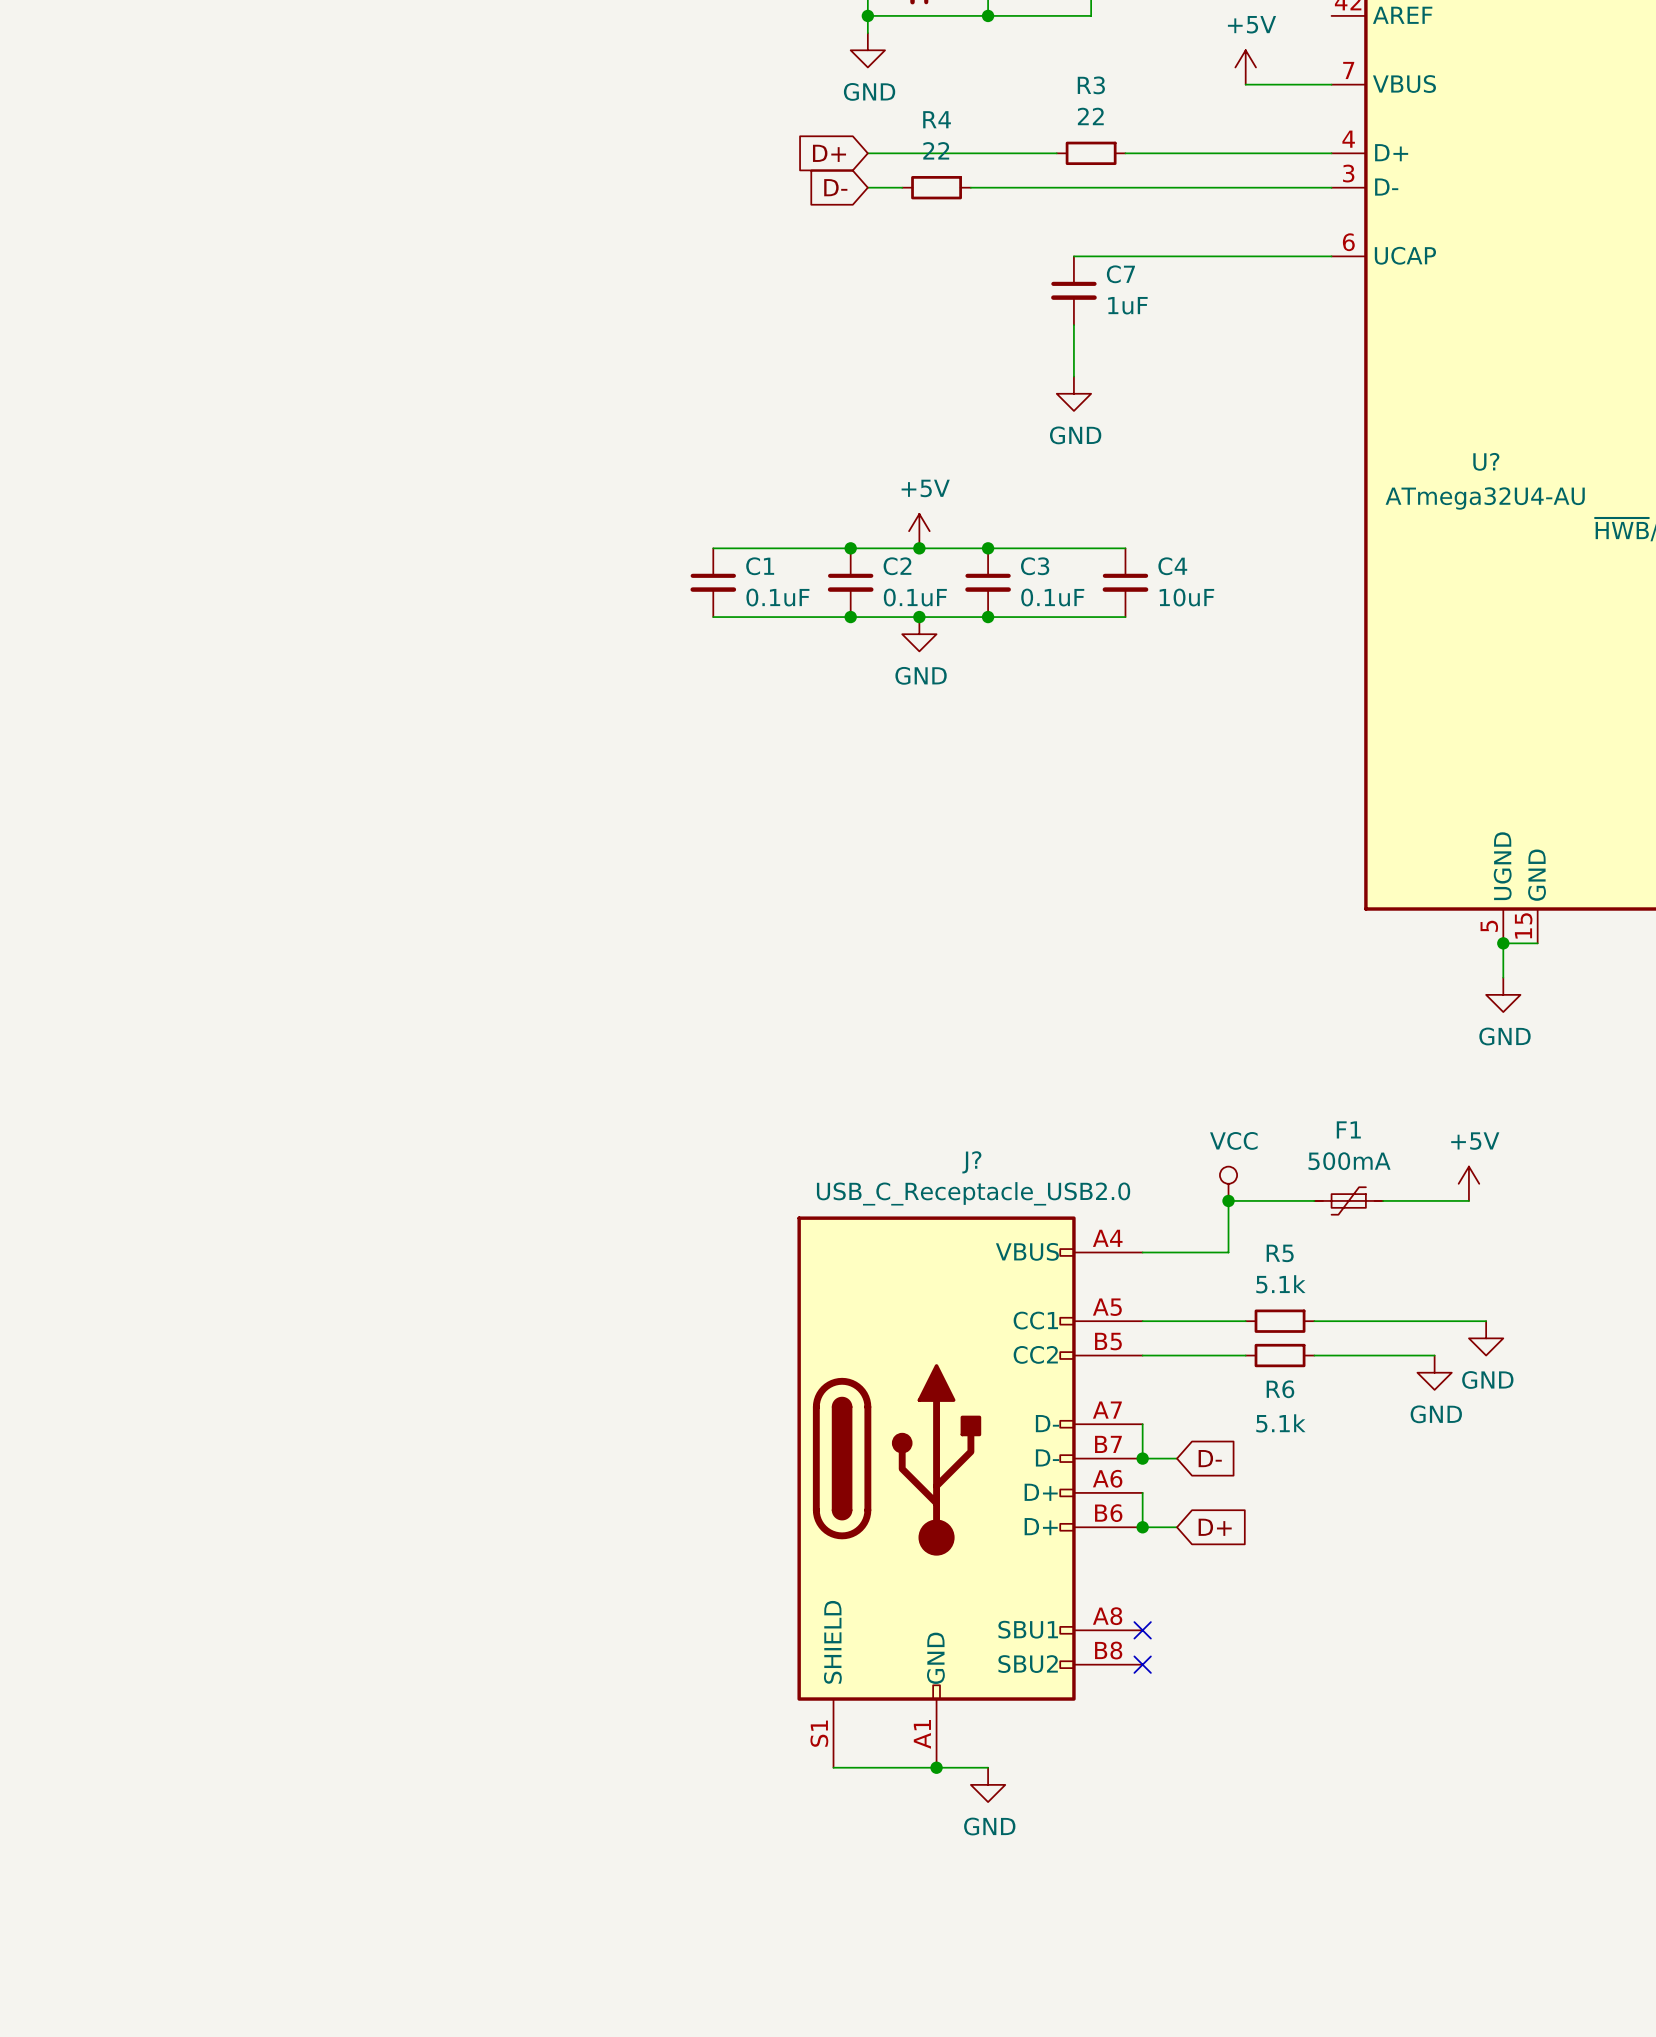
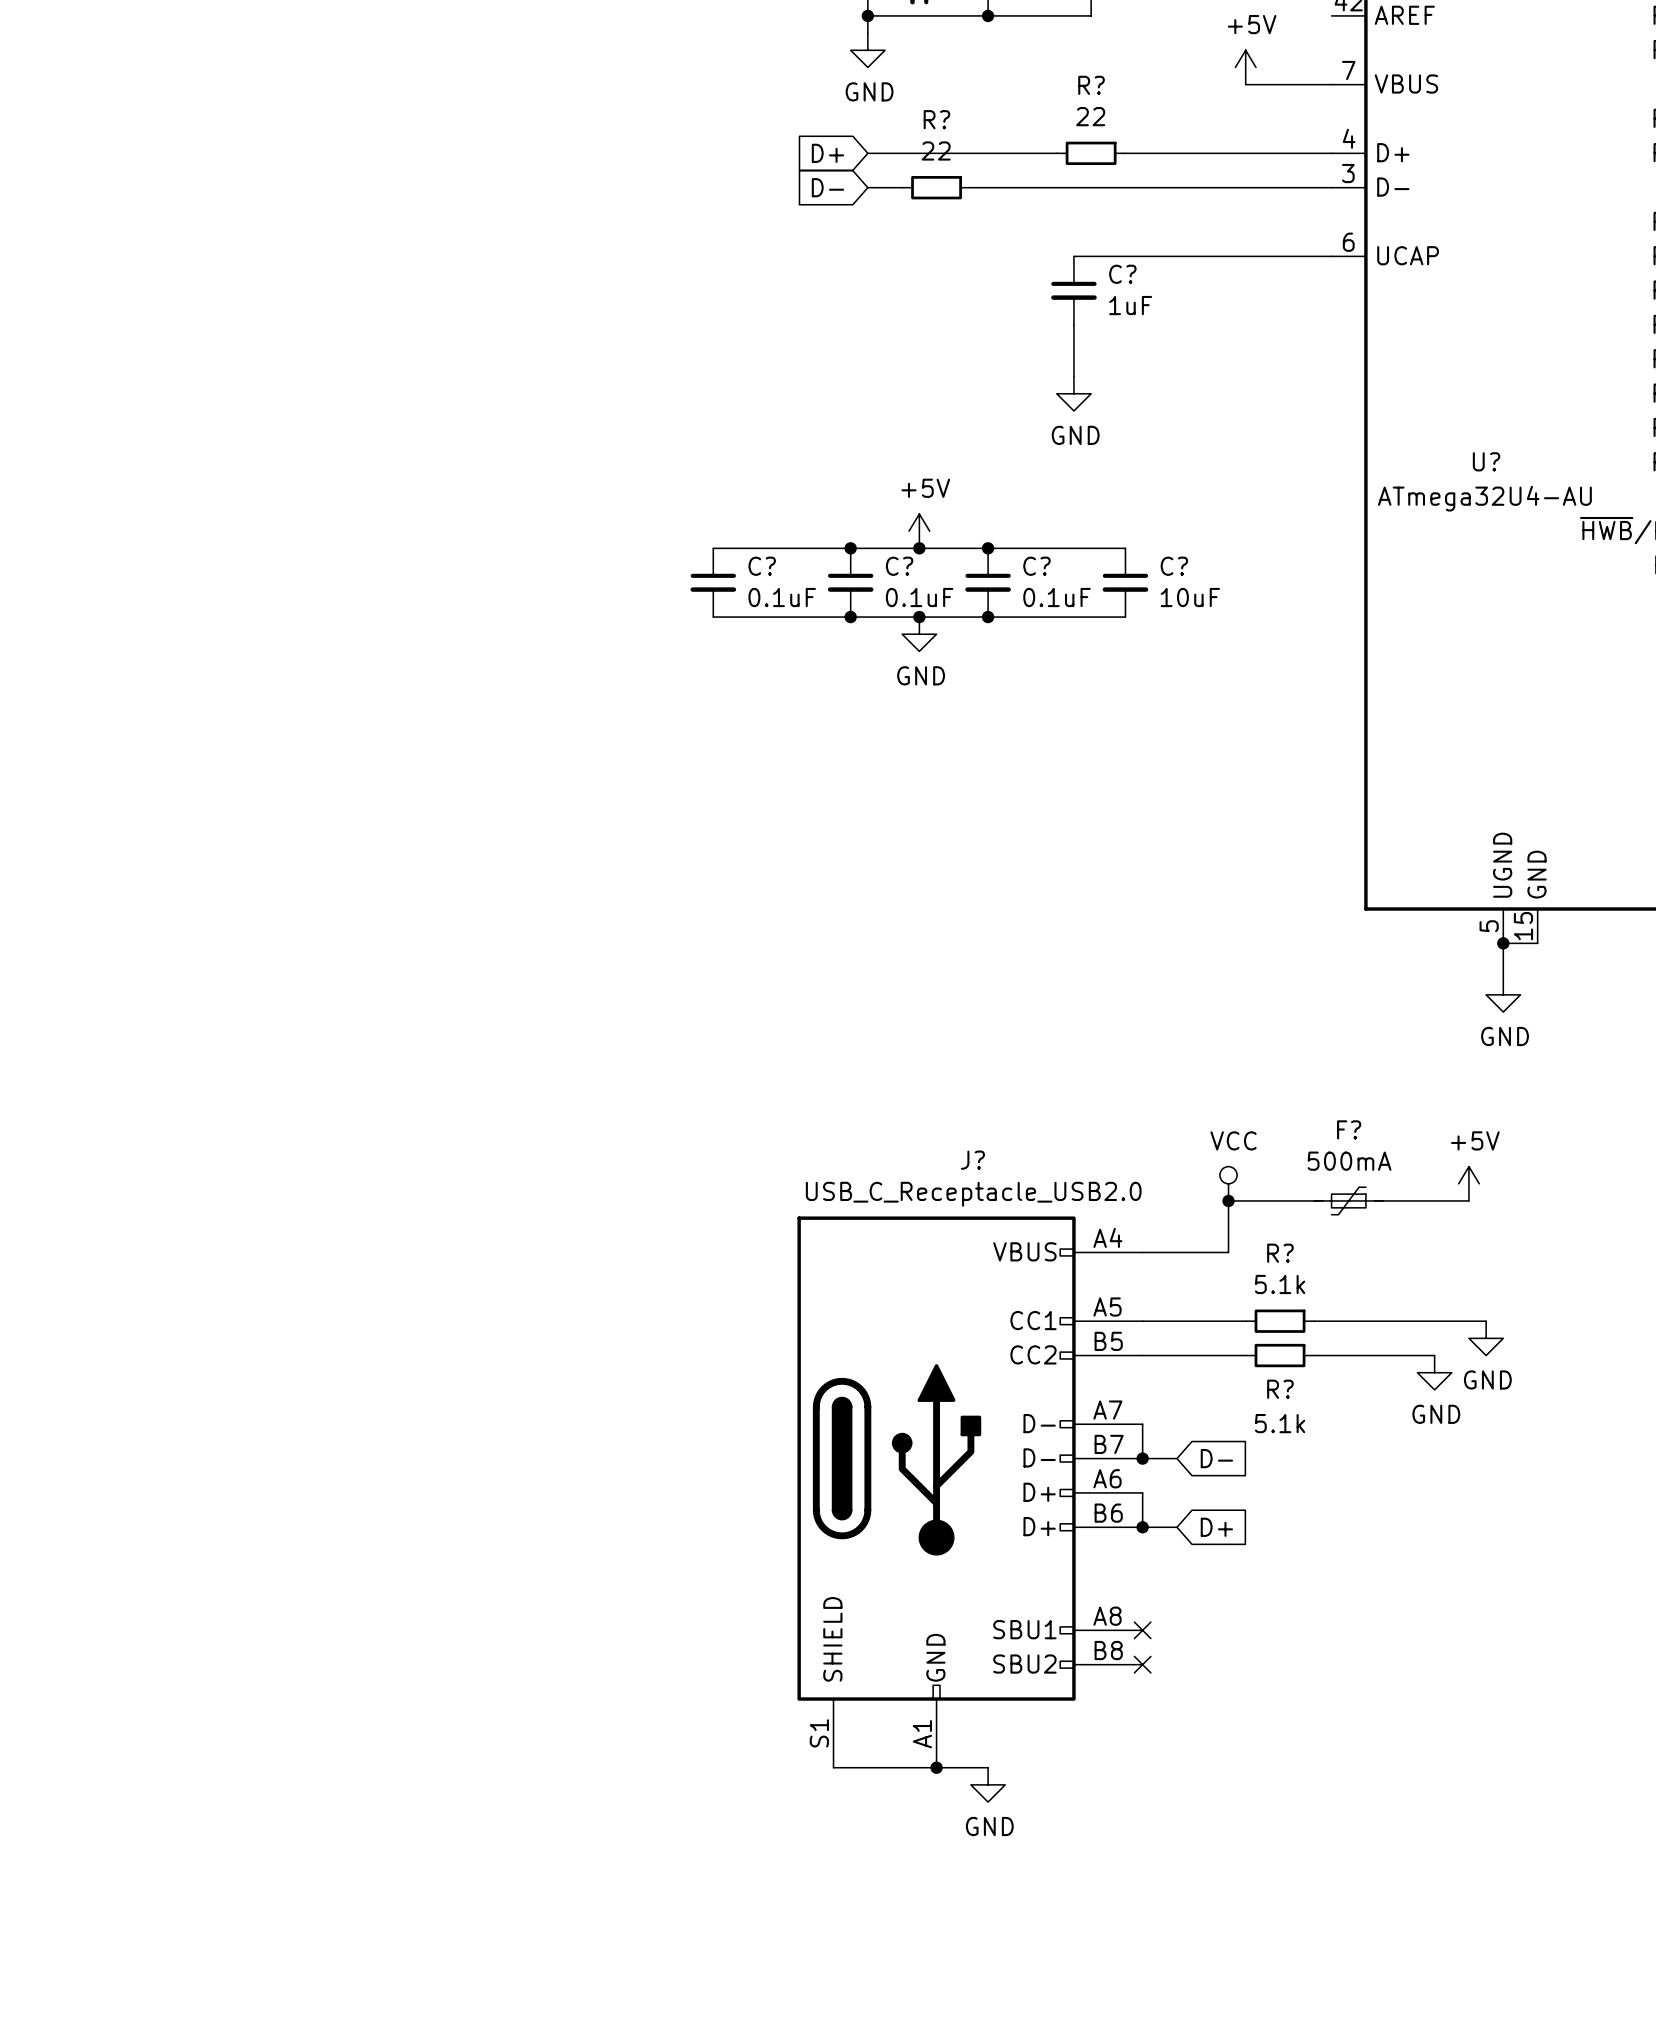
R3 name: R3 (1091, 85) -> R? (1091, 85)
R4 name: R4 (937, 119) -> R? (936, 119)
C7 name: C7 (1120, 274) -> C? (1122, 274)
C1 name: C1 (760, 566) -> C? (762, 566)
C2 name: C2 (897, 566) -> C? (899, 566)
C3 name: C3 (1035, 566) -> C? (1036, 566)
C4 name: C4 (1172, 566) -> C? (1174, 566)
F1 name: F1 (1348, 1129) -> F? (1349, 1129)
R5 name: R5 (1280, 1253) -> R? (1280, 1253)
R6 name: R6 (1280, 1389) -> R? (1280, 1389)

